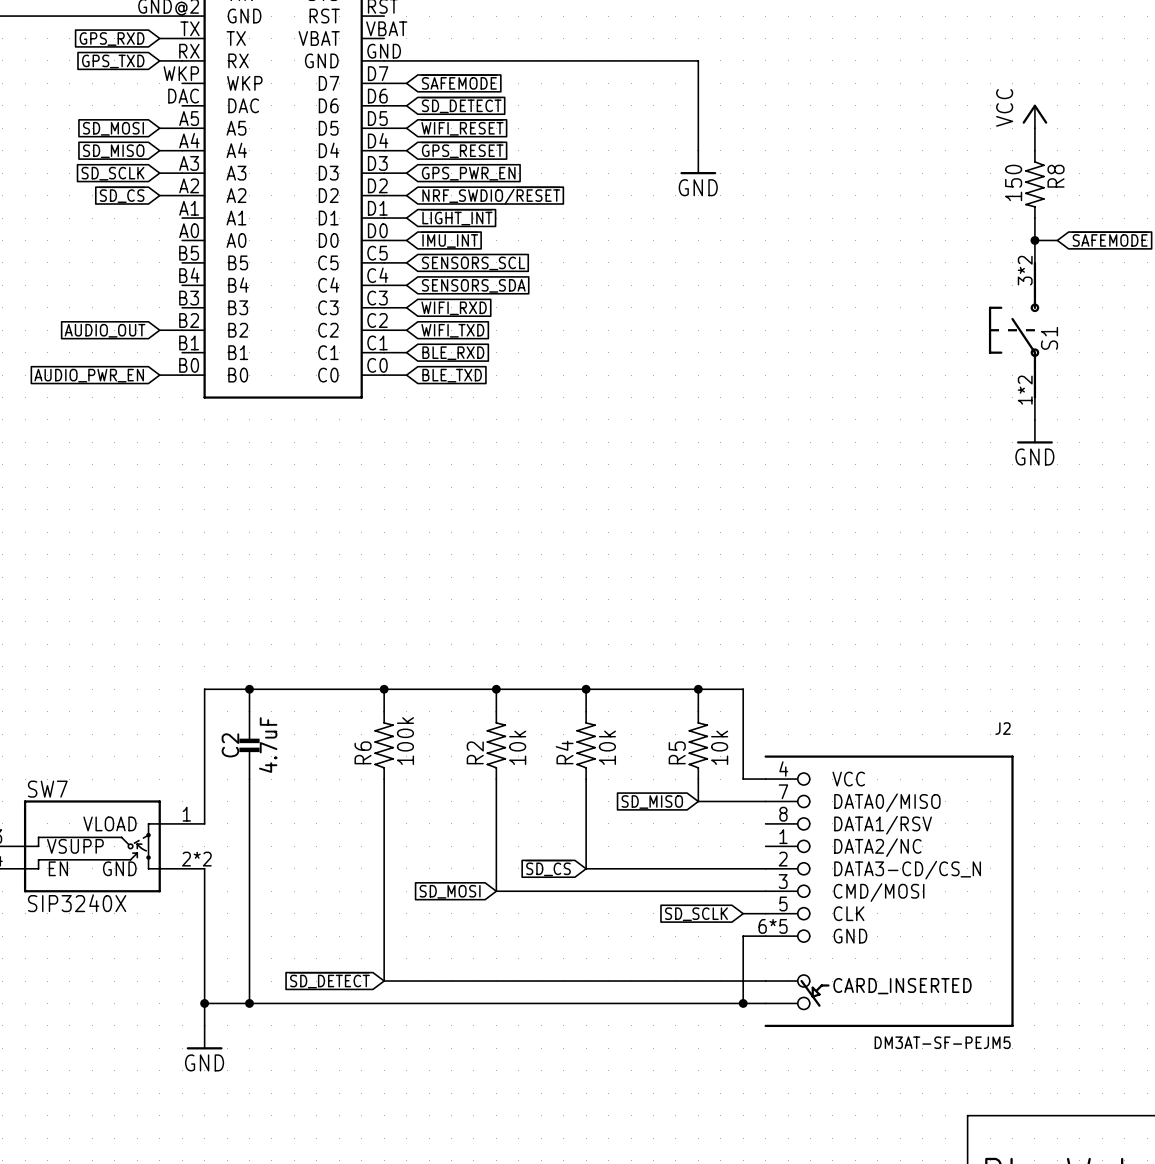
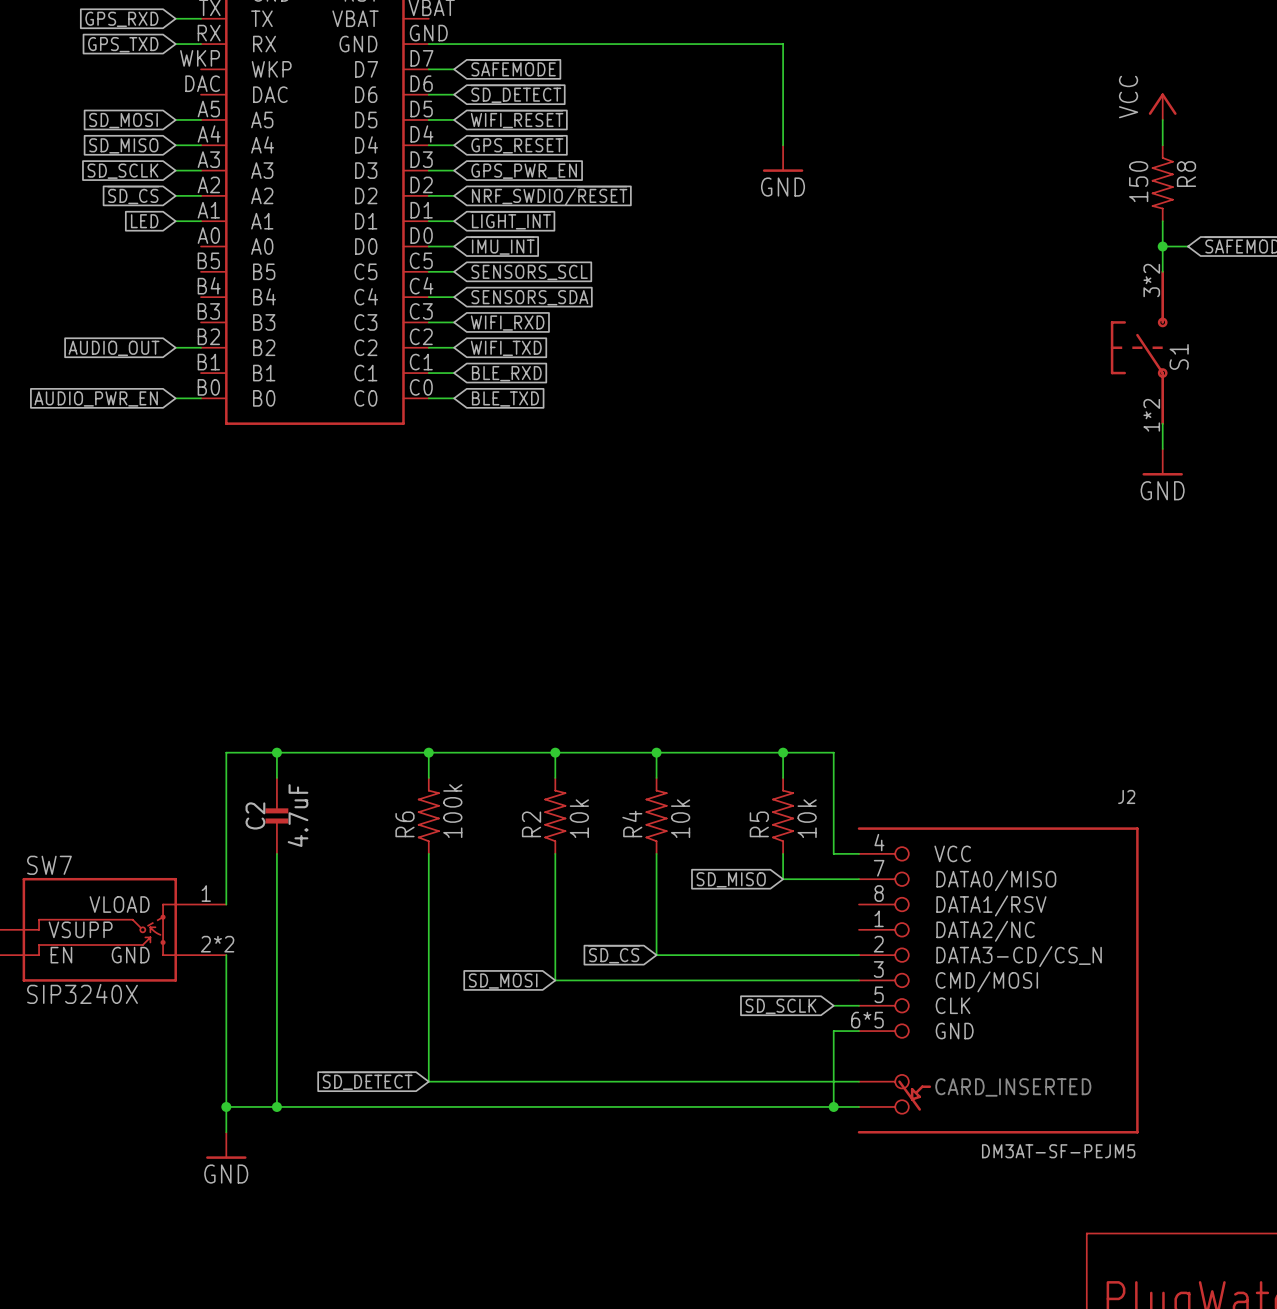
global label: none -> LED (144, 221)
wire: none -> (175, 221) (201, 221)

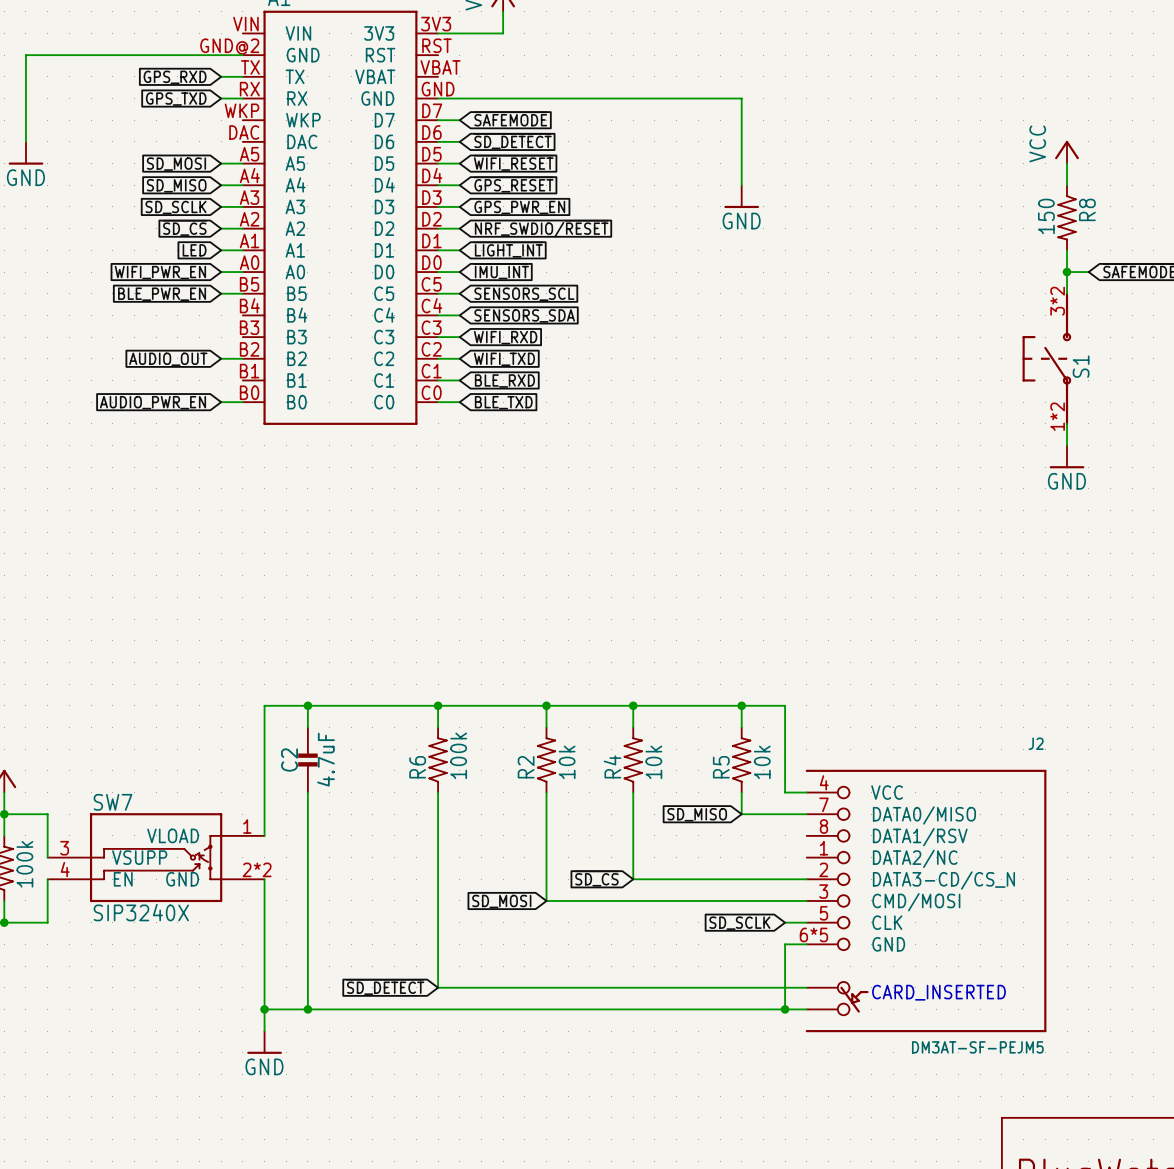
wire: none -> (221, 272) (242, 272)
global label: none -> WIFI_PWR_EN (160, 272)
wire: none -> (221, 293) (242, 293)
global label: none -> BLE_PWR_EN (162, 294)

